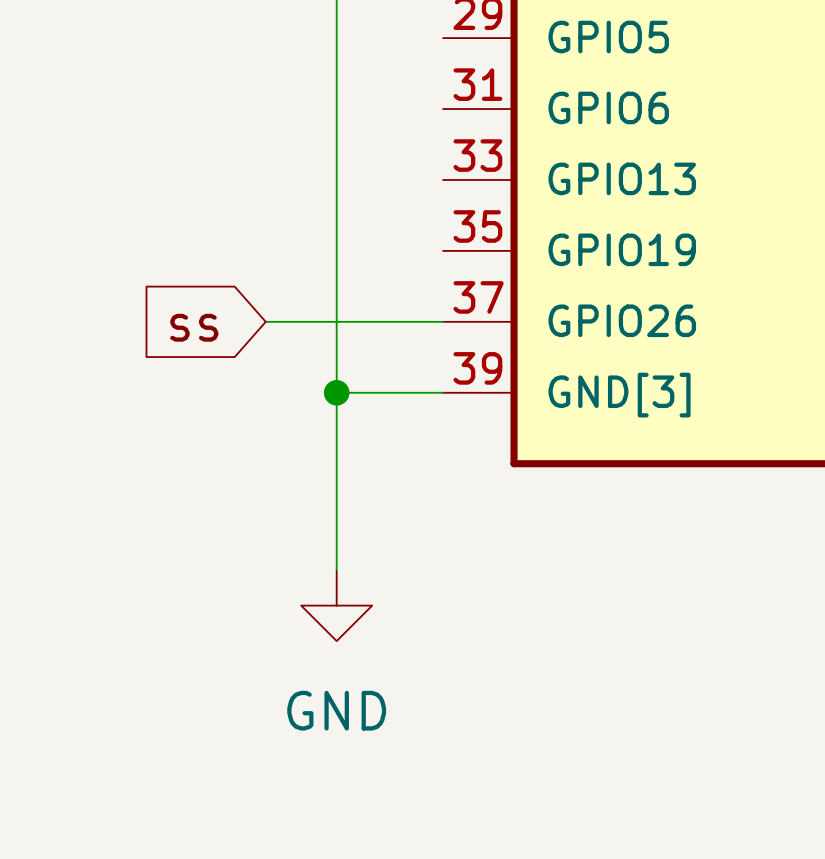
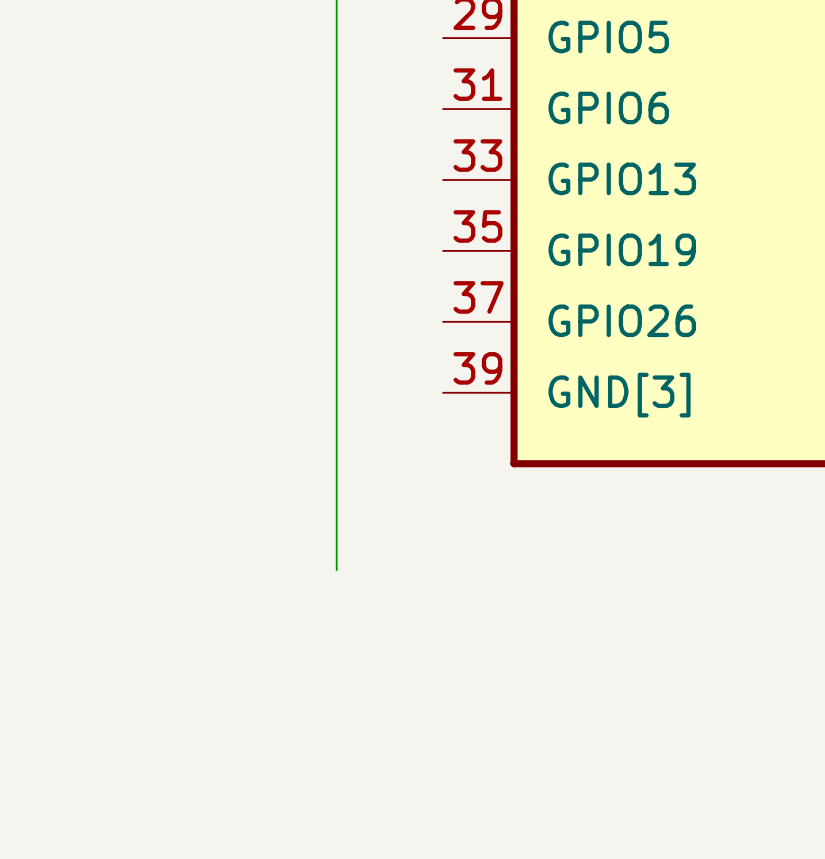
wire: (265, 321) (443, 321) -> none
global label: ss (194, 327) -> none
wire: (336, 392) (443, 392) -> none
junction: (336, 392) -> none
power symbol: GND (336, 605) -> none

